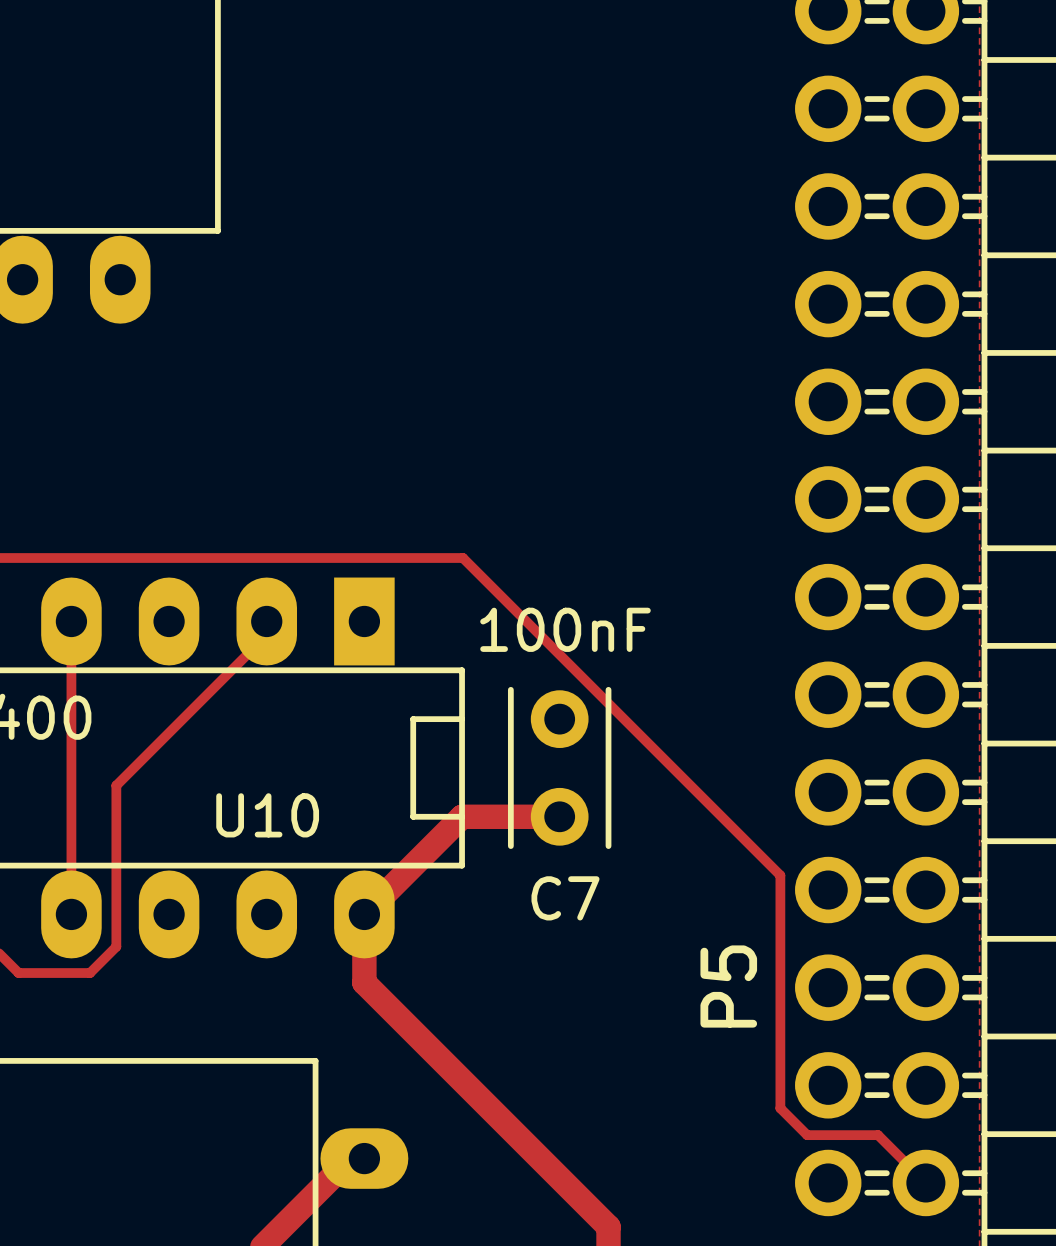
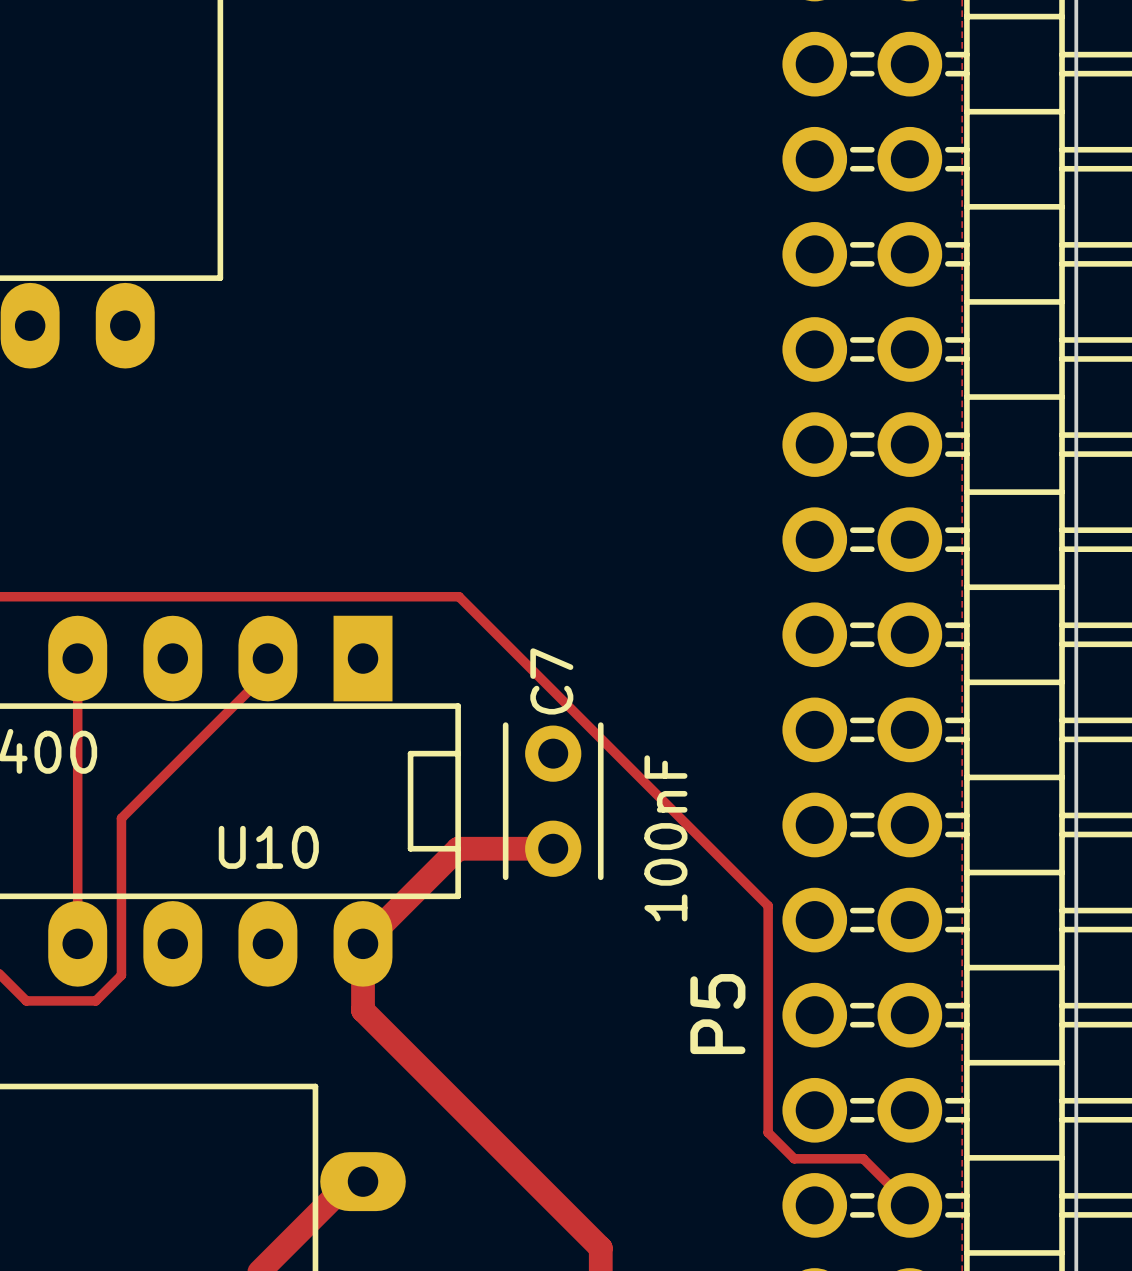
C7 value rotation: 0° (565, 629) -> 90° counterclockwise (665, 838)
C7 value position: 100nF (565, 629) -> 100nF (665, 838)
C7 name rotation: 0° (565, 898) -> 90° counterclockwise (551, 681)
C7 name position: C7 (565, 898) -> C7 (551, 681)

